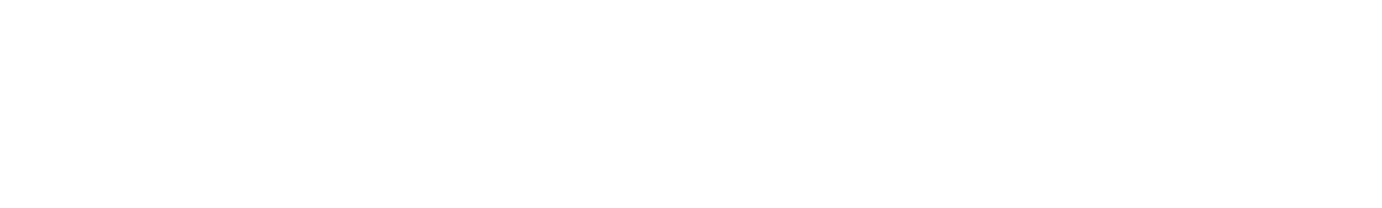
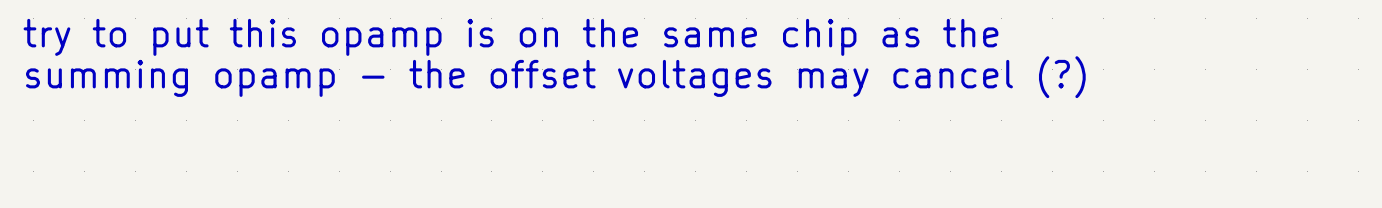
text: none -> try to put this opamp is on the same chip as the (510, 37)
text: none -> summing opamp - the offset voltages may cancel (?) (555, 77)

